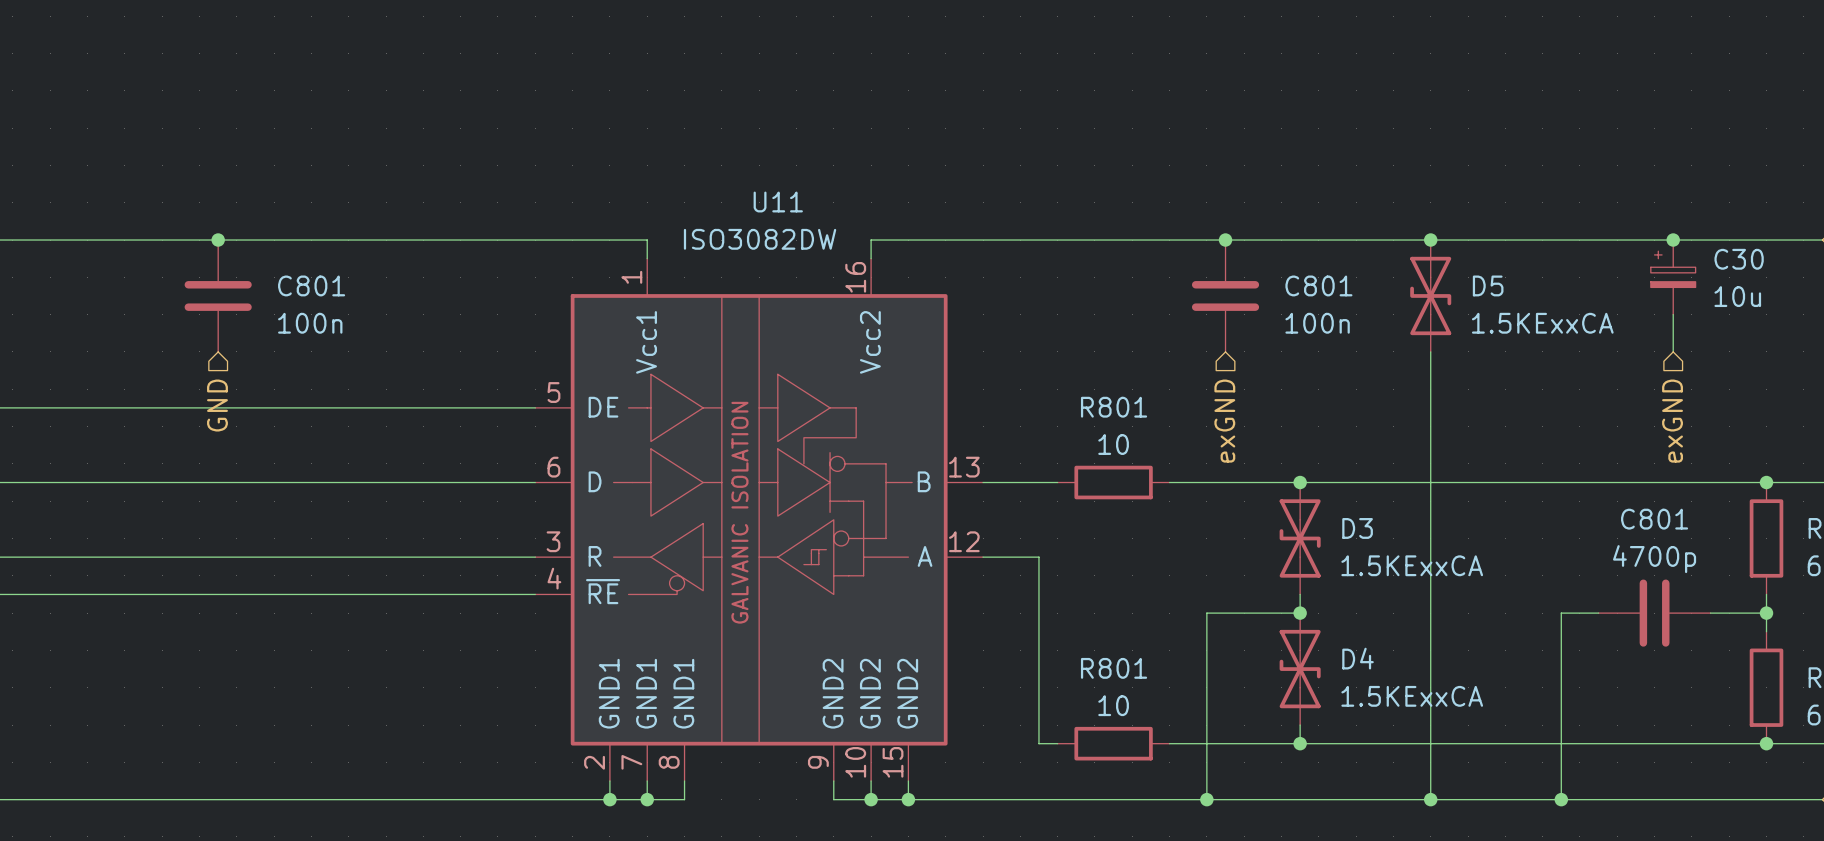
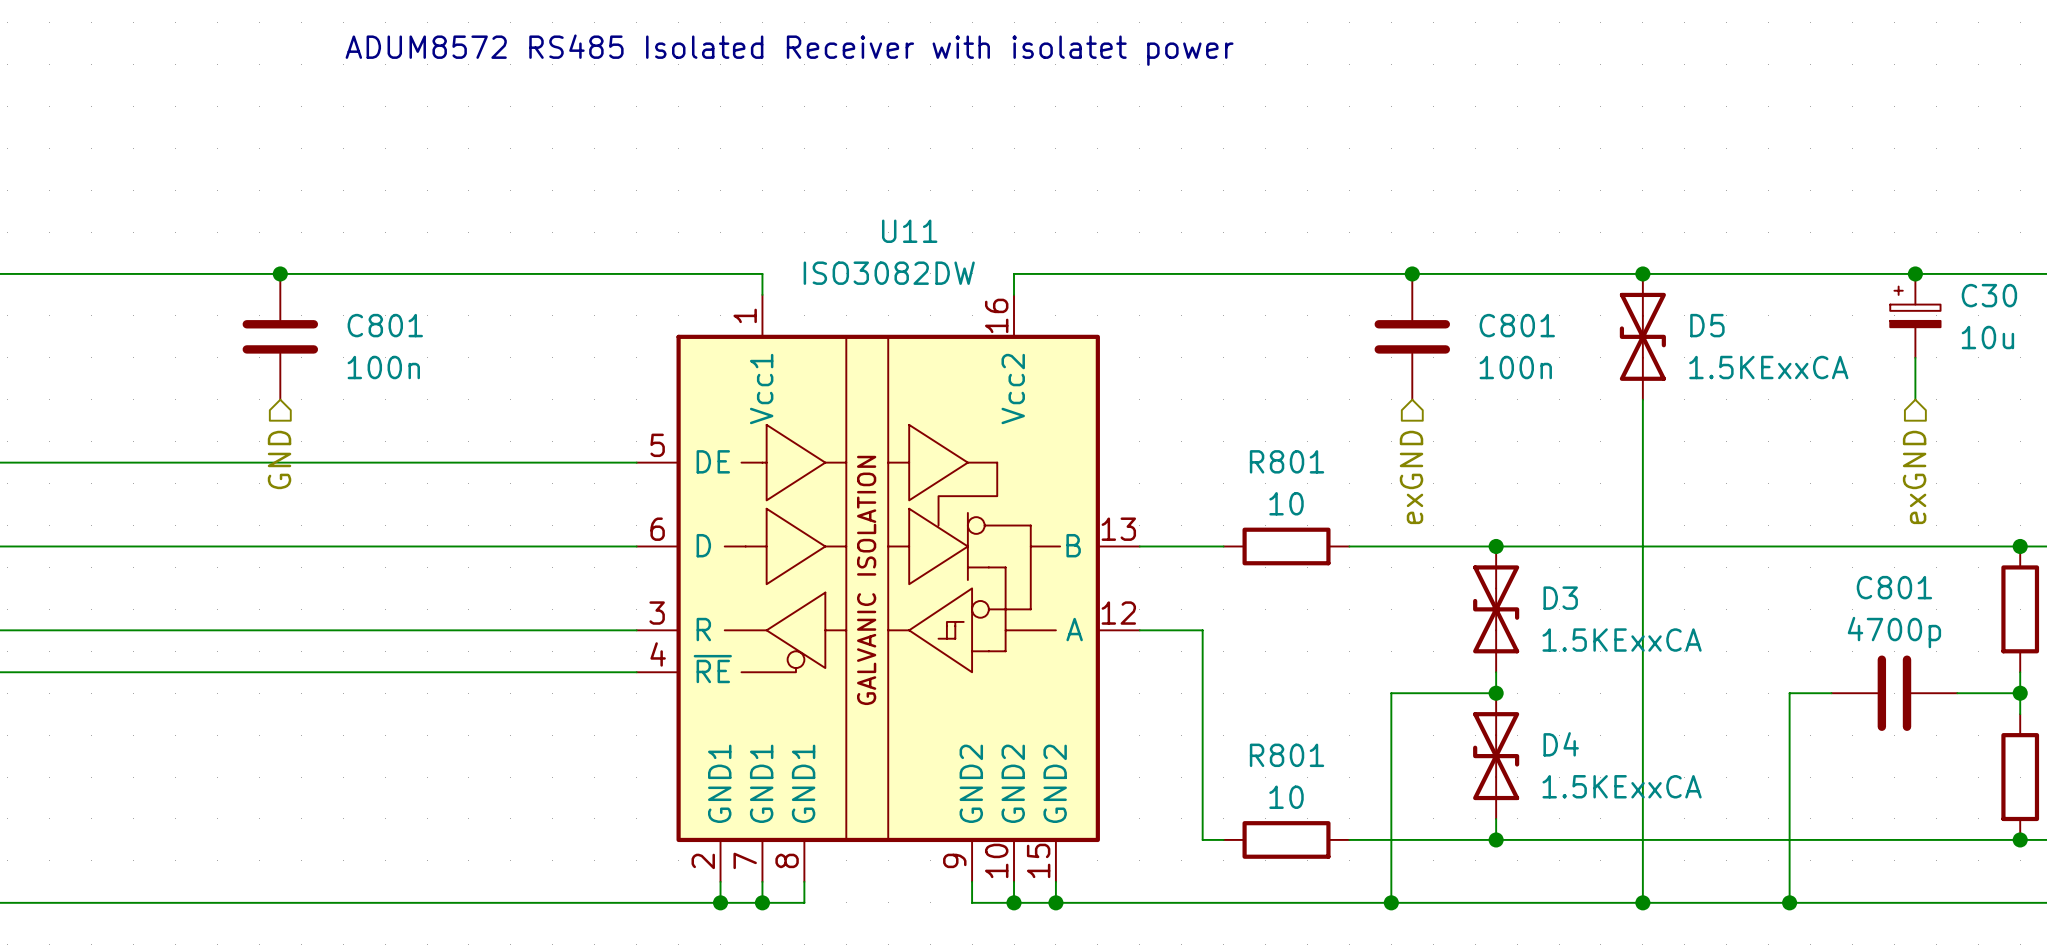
text: none -> ADUM8572 RS485 Isolated Receiver with isolatet power (789, 50)

